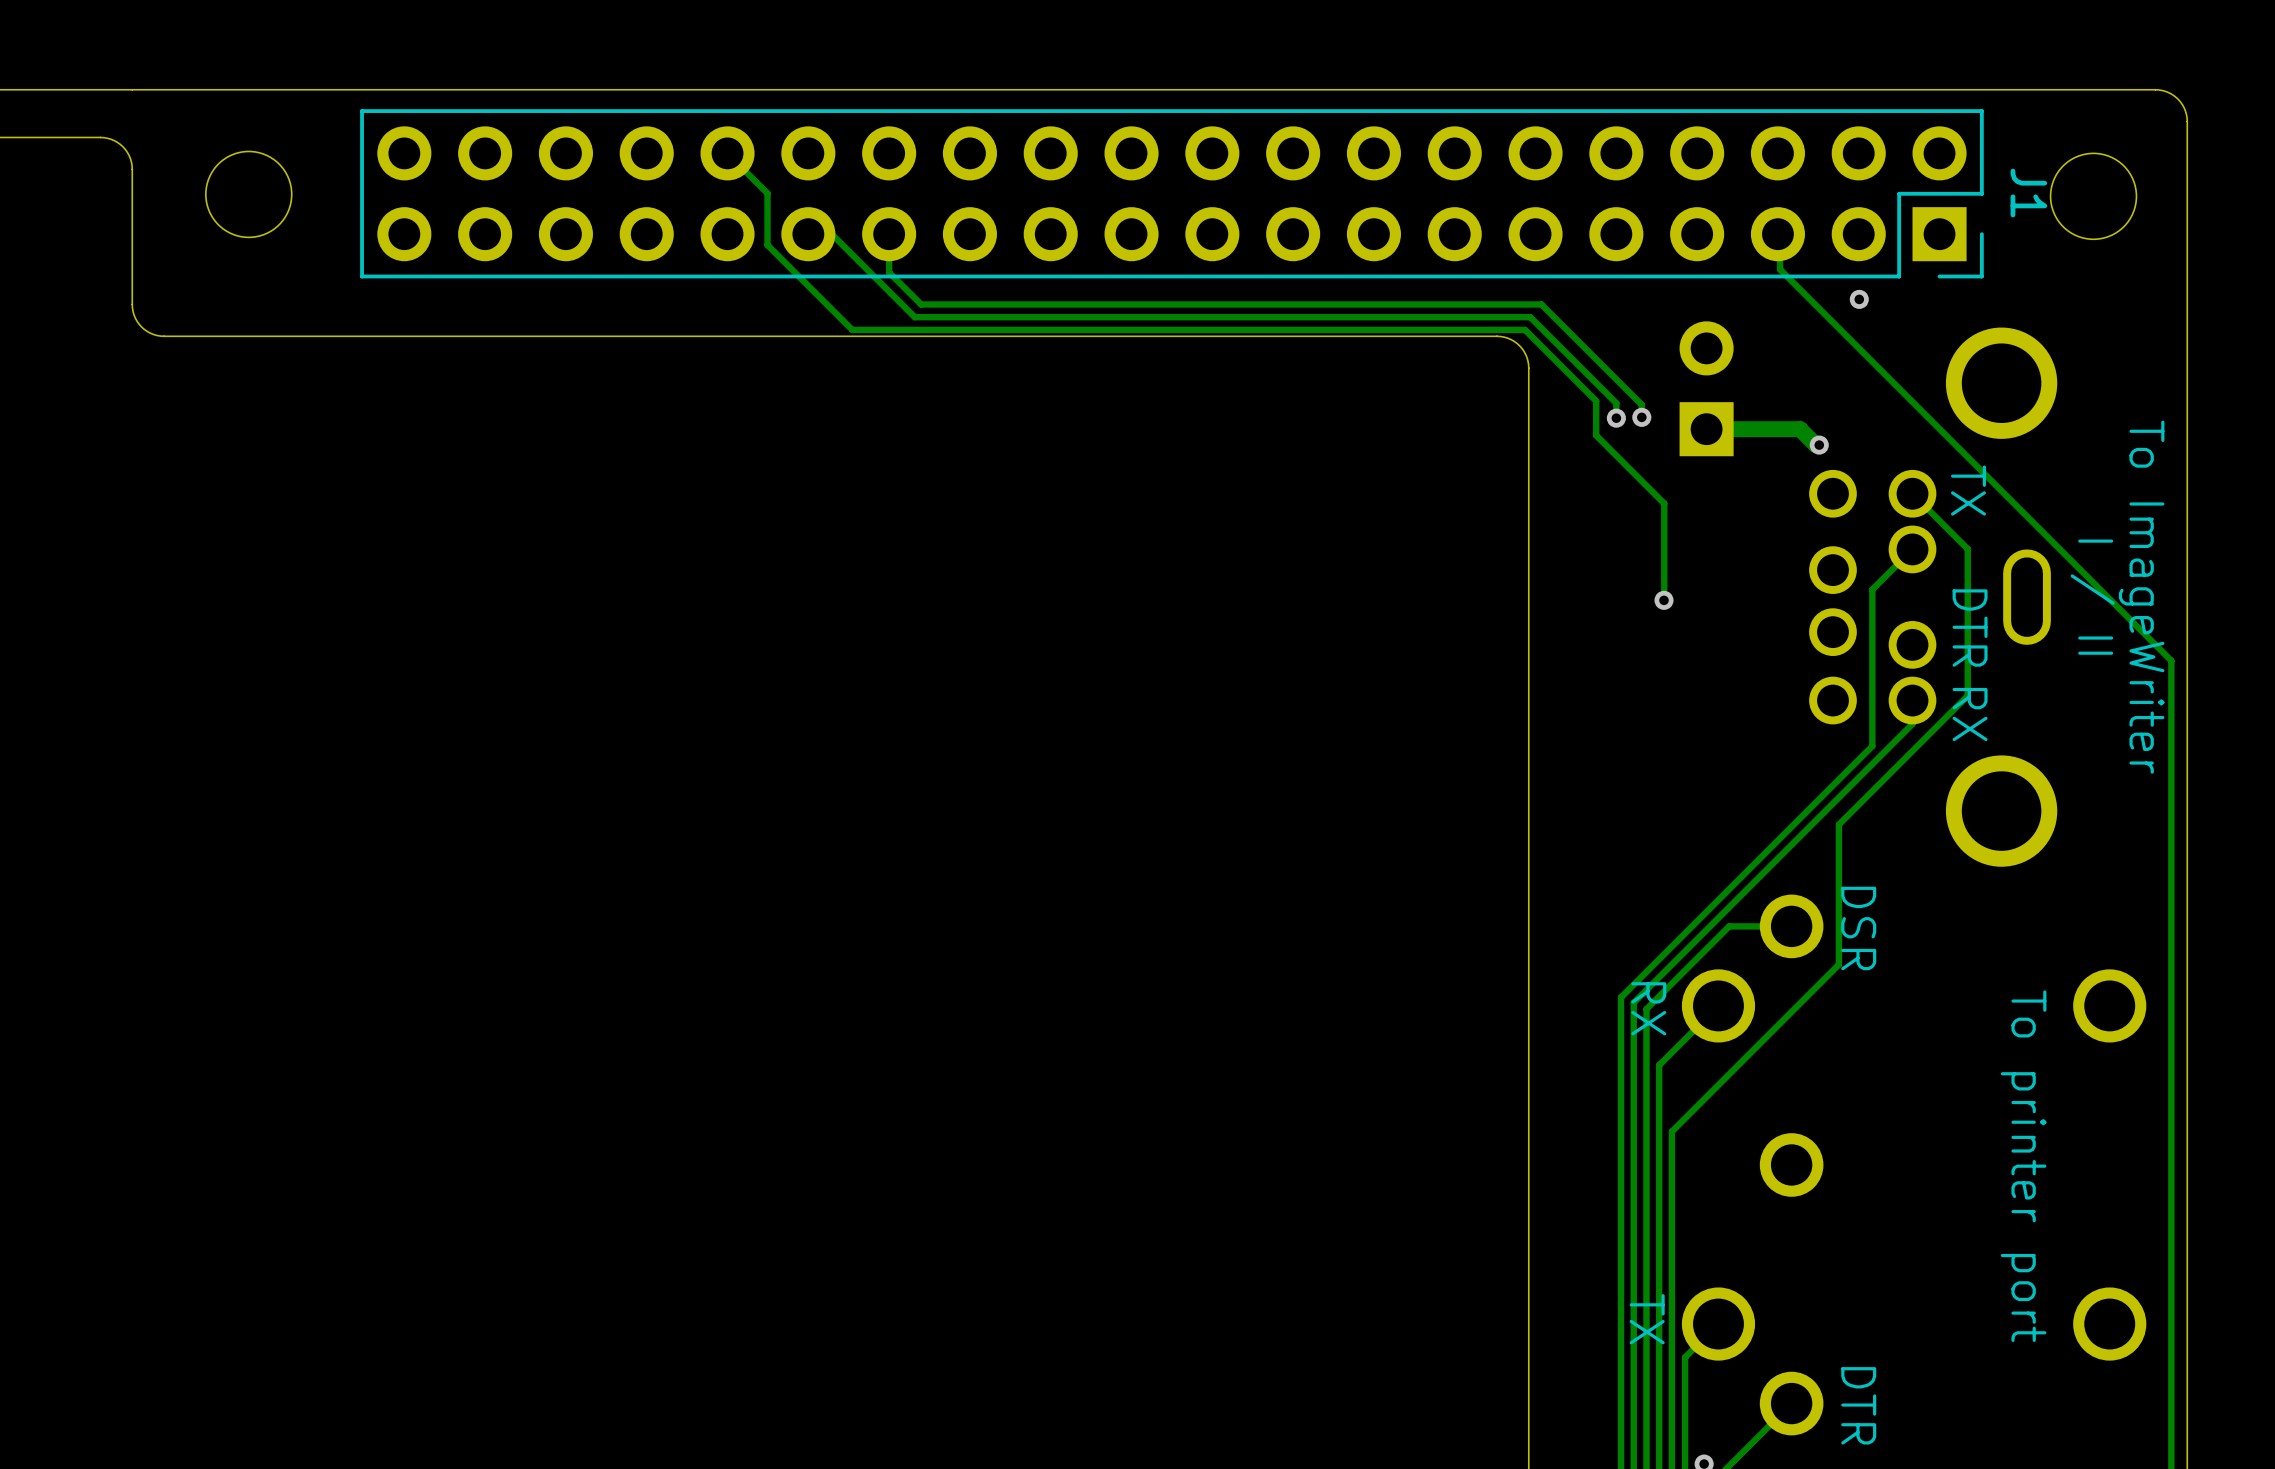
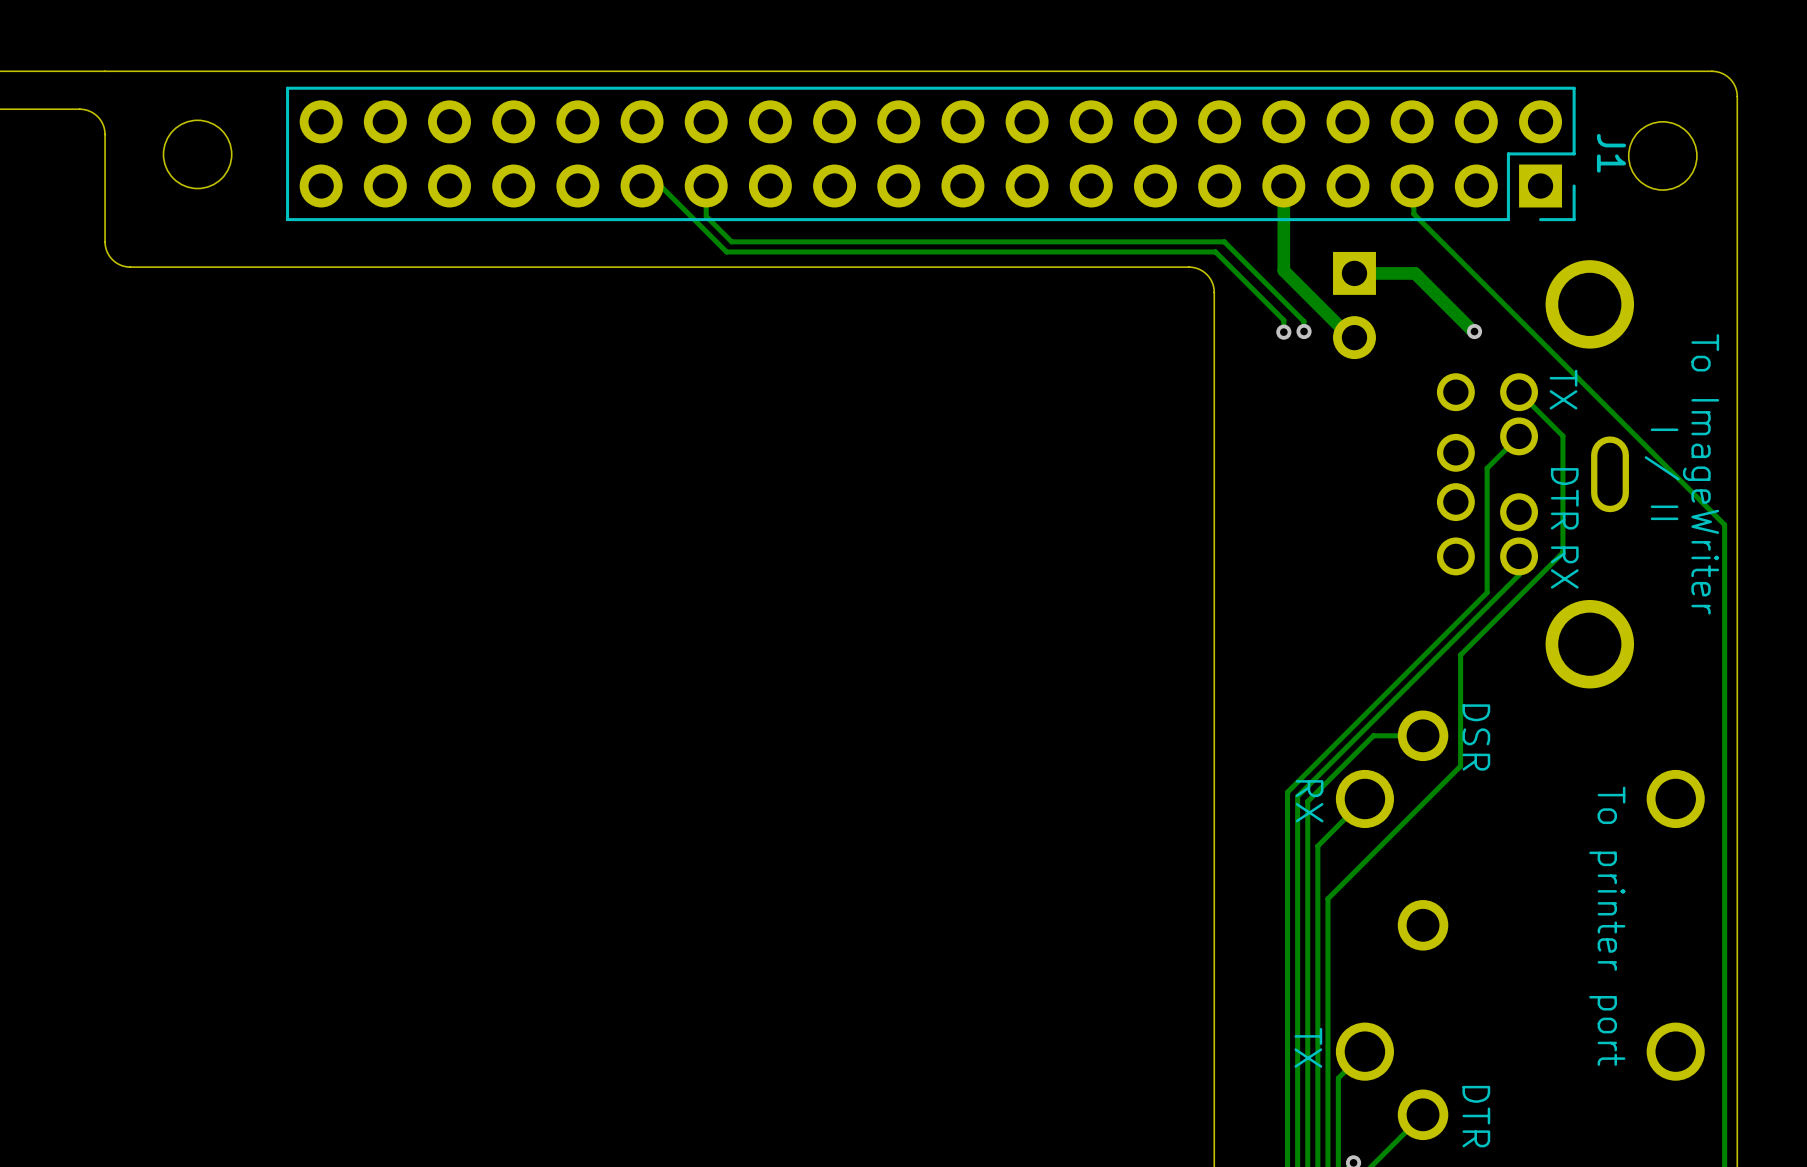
track: (727, 153) (767, 193) (767, 245) (852, 329) (1525, 329) (1596, 401) (1596, 435) (1664, 503) (1664, 600) -> none
track: none -> (1283, 186) (1283, 270) (1350, 337) (1354, 337)
via: (1859, 299) -> none
track: none -> (1354, 273) (1415, 273) (1474, 331)
part rotation: 0° (1706, 388) -> 180° (1354, 305)
track: (1706, 429) (1800, 429) (1816, 445) (1819, 445) -> none
via position: (1819, 445) -> (1474, 331)
via: (1664, 600) -> none

